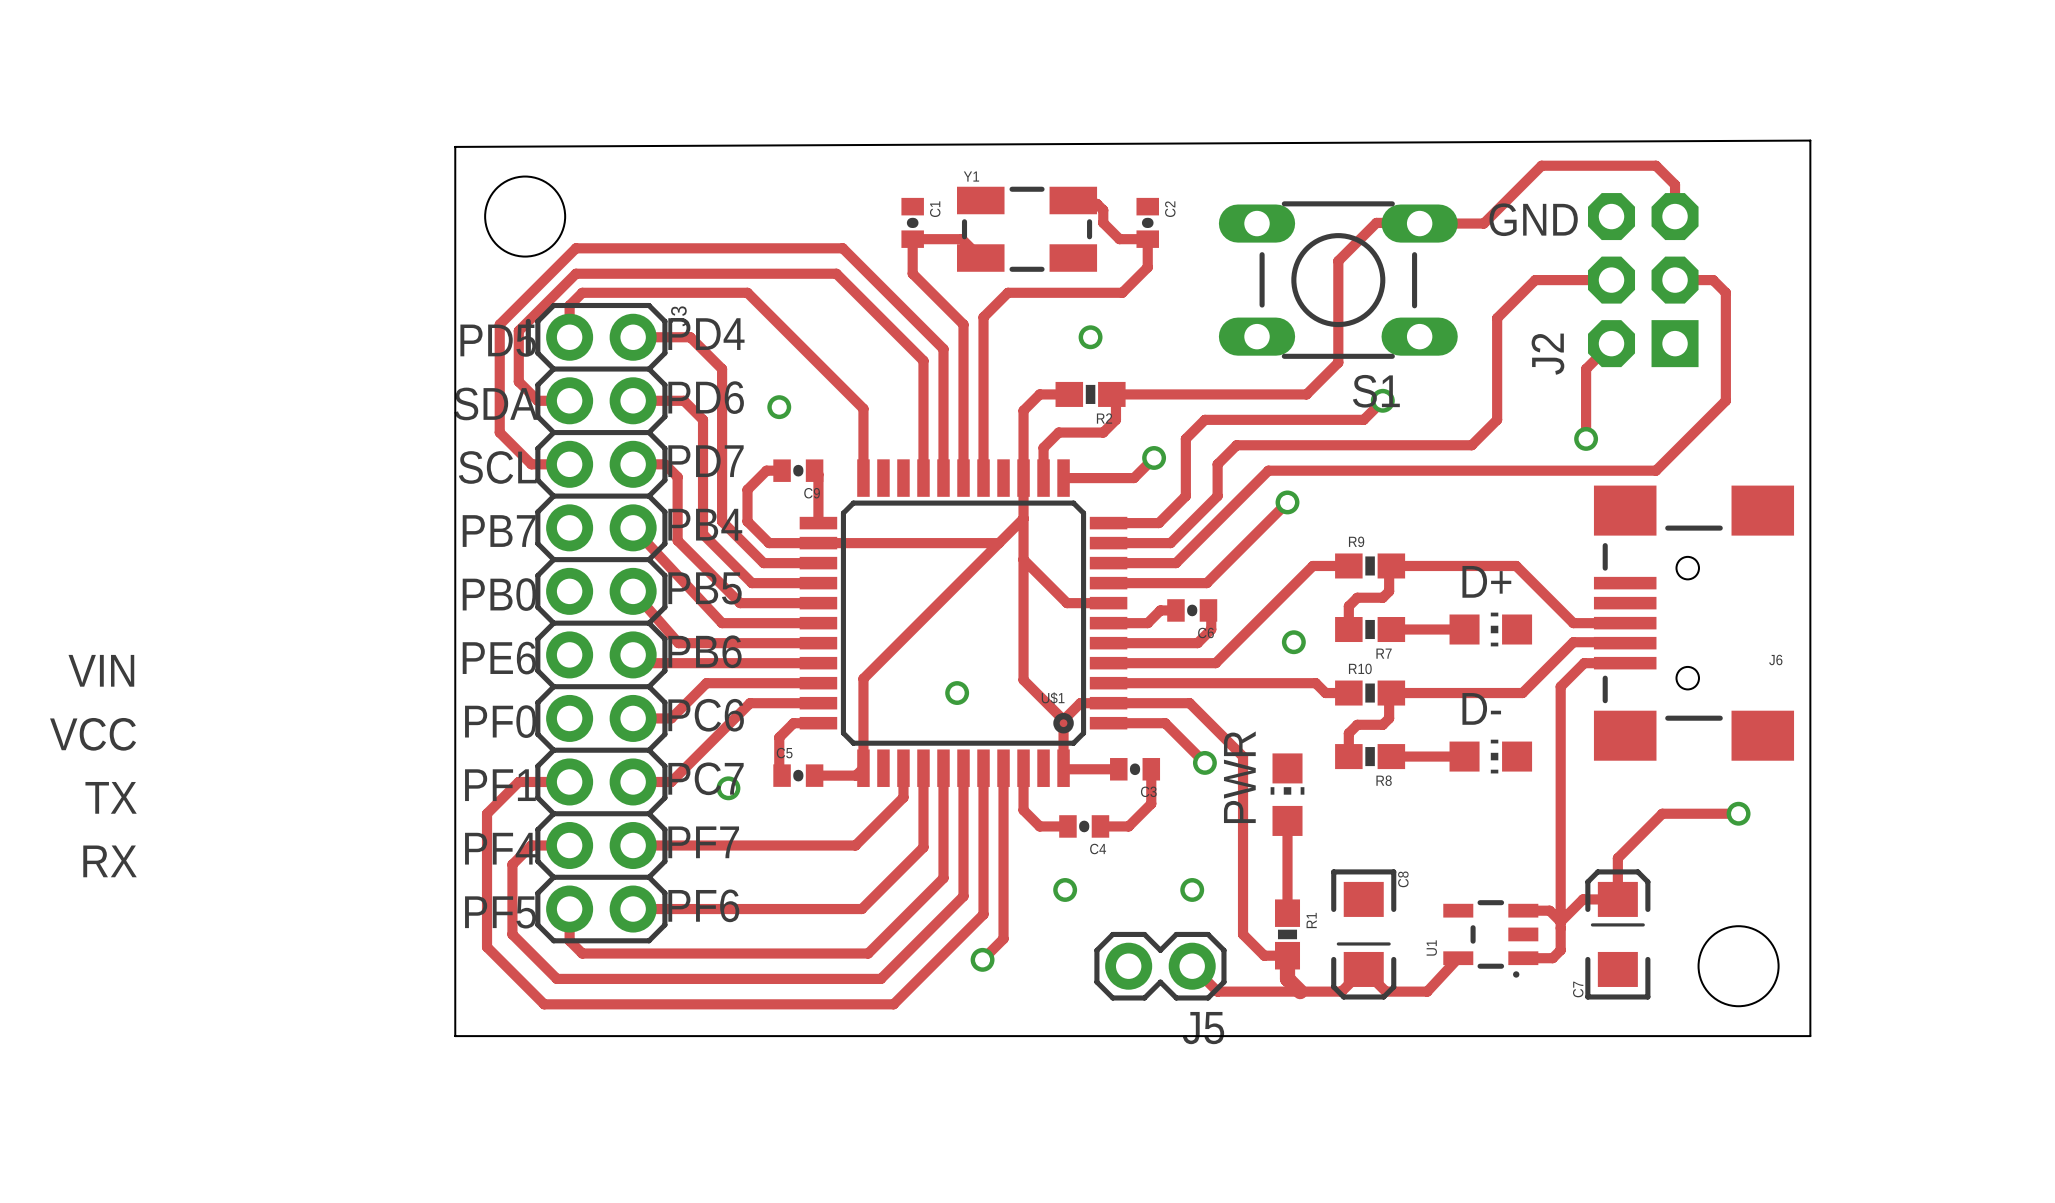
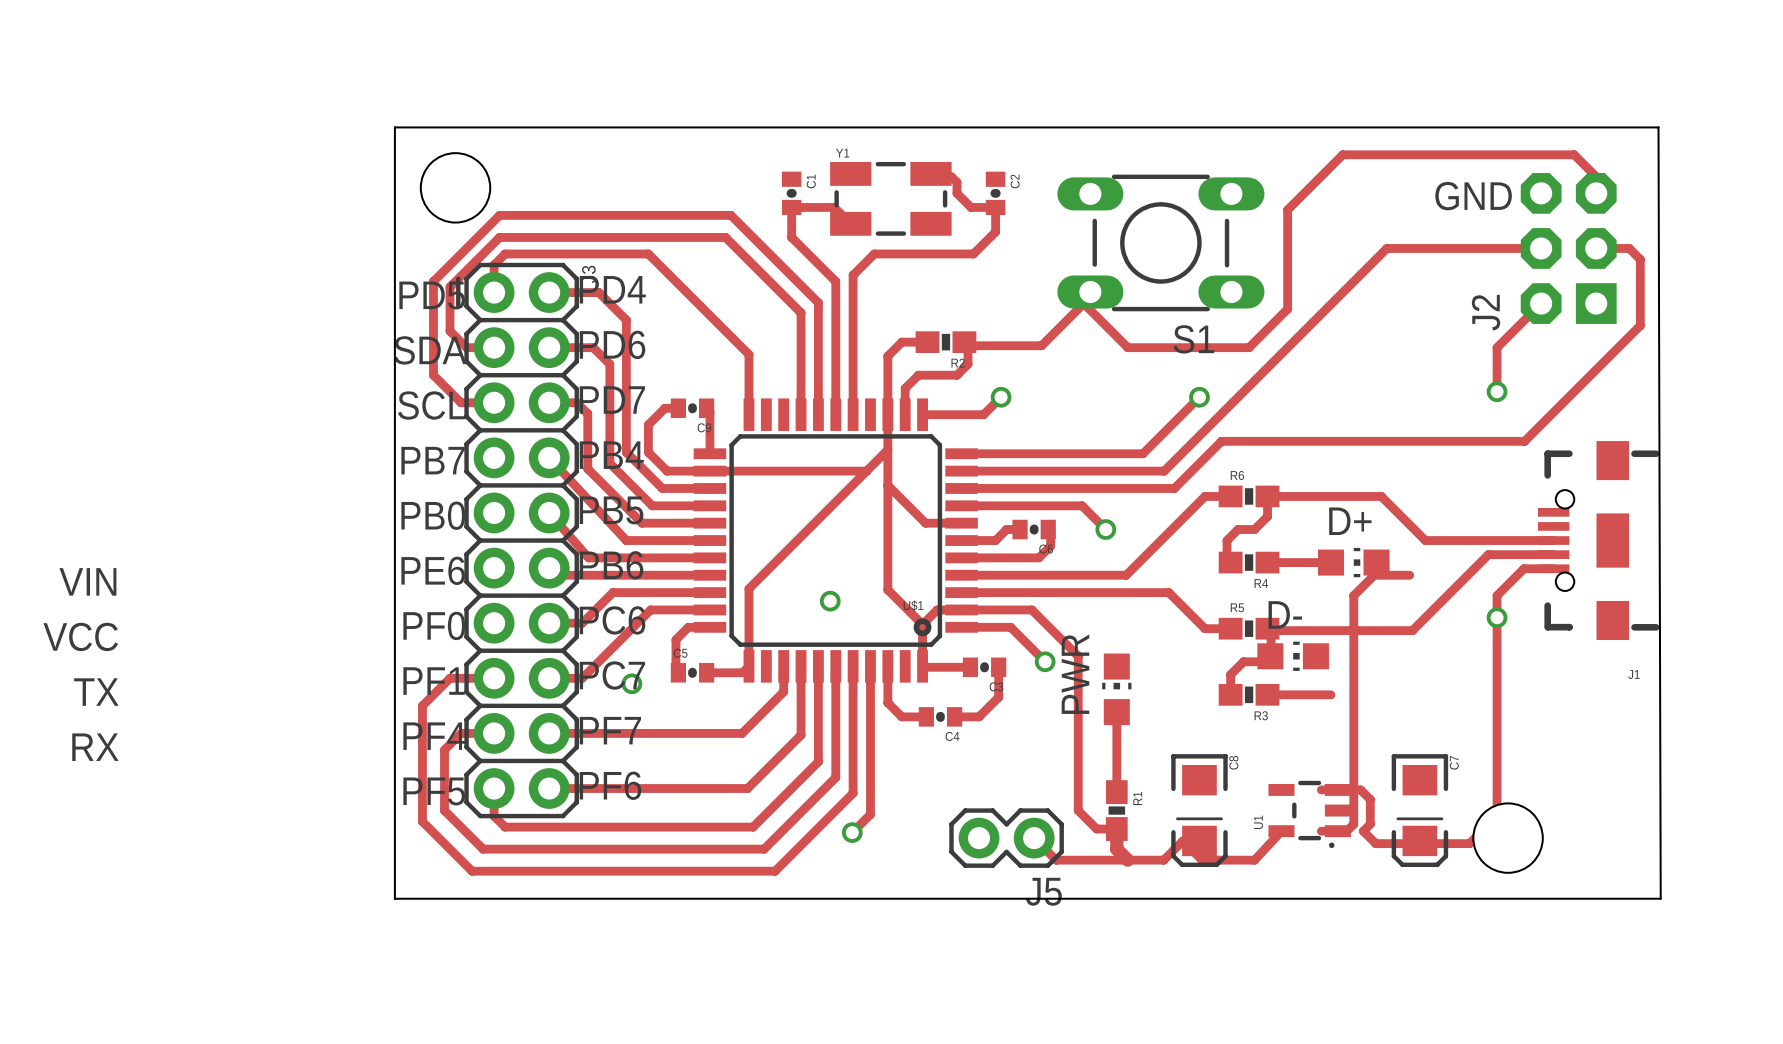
board edge: (455, 146) (1810, 140) (1810, 1036) -> (394, 127) (1658, 127) (1660, 898) (1570, 898)
track: (1675, 216) (1675, 184) (1655, 165) (1541, 165) (1483, 223) (1376, 222) (1338, 261) (1338, 362) (1306, 394) (1111, 394) -> none
text position: GND (1533, 219) -> GND (1473, 196)
track: none -> (1596, 193) (1596, 176) (1574, 154) (1342, 154) (1287, 209) (1287, 309) (1249, 347) (1127, 347) (1083, 303) (1041, 345) (968, 345)
track: (1611, 280) (1535, 280) (1497, 318) (1497, 419) (1471, 445) (1236, 445) (1217, 464) (1217, 496) (1170, 543) -> (1541, 248) (1386, 248) (1164, 471) (1015, 471)
J2 position: (1643, 280) -> (1568, 248)
track: (1675, 280) (1713, 280) (1725, 292) (1725, 400) (1655, 470) (1268, 470) (1176, 563) -> (1596, 248) (1629, 248) (1640, 259) (1640, 325) (1524, 441) (1221, 441) (1174, 488) (1020, 488)
via: (1090, 337) -> none
track: (1611, 343) (1586, 369) (1586, 438) -> none
track: none -> (1541, 303) (1497, 347) (1497, 391)
track: (1382, 400) (1363, 419) (1204, 419) (1185, 438) (1185, 496) (1158, 523) -> (1199, 397) (1142, 453) (1005, 453)
via: (1382, 400) -> none
via: (779, 407) -> none
via: (1586, 438) -> none
via: none -> (1497, 391)
via: none -> (1199, 397)
track: (1287, 502) (1206, 583) -> (1105, 529) (1082, 505) (1046, 505)
via: (1287, 502) -> none
track: (1348, 565) (1312, 565) (1215, 663) -> (1230, 496) (1204, 496) (1126, 575) (1054, 575)
R9: (1370, 565) -> none
R6: none -> (1249, 496)
track: (1625, 623) (1573, 623) (1516, 565) (1391, 565) (1389, 568) (1389, 591) (1382, 597) (1357, 597) (1348, 606) (1348, 629) -> none
J6: (1694, 623) -> none
track: none -> (1553, 540) (1425, 540) (1381, 496) (1267, 496) (1267, 516) (1254, 529) (1238, 529) (1227, 540) (1227, 558) (1230, 562)
J1: none -> (1598, 540)
R7: (1370, 629) -> none
track: (1391, 629) (1464, 629) -> (1267, 562) (1330, 562)
D+ position: (1490, 629) -> (1353, 562)
track: none -> (1553, 554) (1488, 554) (1412, 630) (1271, 630)
via position: (1293, 642) -> (1105, 529)
track: (1625, 643) (1573, 642) (1522, 693) (1391, 693) (1389, 695) (1389, 718) (1382, 724) (1357, 724) (1348, 733) (1348, 756) -> none
R4: none -> (1249, 562)
track: (1315, 683) (1325, 693) (1348, 693) -> (1141, 592) (1168, 592) (1204, 628) (1230, 628)
R10: (1370, 693) -> none
R5: none -> (1249, 628)
track: none -> (1271, 630) (1271, 650) (1260, 661) (1243, 661) (1230, 674) (1230, 694)
R8: (1370, 756) -> none
track: (1391, 756) (1464, 756) -> (1267, 694) (1330, 694)
R3: none -> (1249, 694)
track: (1738, 813) (1662, 813) (1617, 858) (1617, 899) (1582, 899) (1560, 921) (1549, 910) -> (1553, 568) (1523, 568) (1497, 595) (1497, 816) (1469, 843) (1422, 843) (1419, 840) (1417, 843) (1375, 843) (1363, 831) (1370, 824) (1370, 799) (1360, 789) (1344, 789)
via position: (1738, 813) -> (1497, 617)
via: (1065, 889) -> none
via: (1192, 889) -> none
C8 position: (1363, 934) -> (1199, 810)
C7 rotation: 0° (1617, 934) -> 180° (1419, 810)
U1 position: (1490, 938) -> (1309, 814)
track: (1458, 958) (1427, 991) -> (1281, 831) (1254, 860) (1238, 860)

